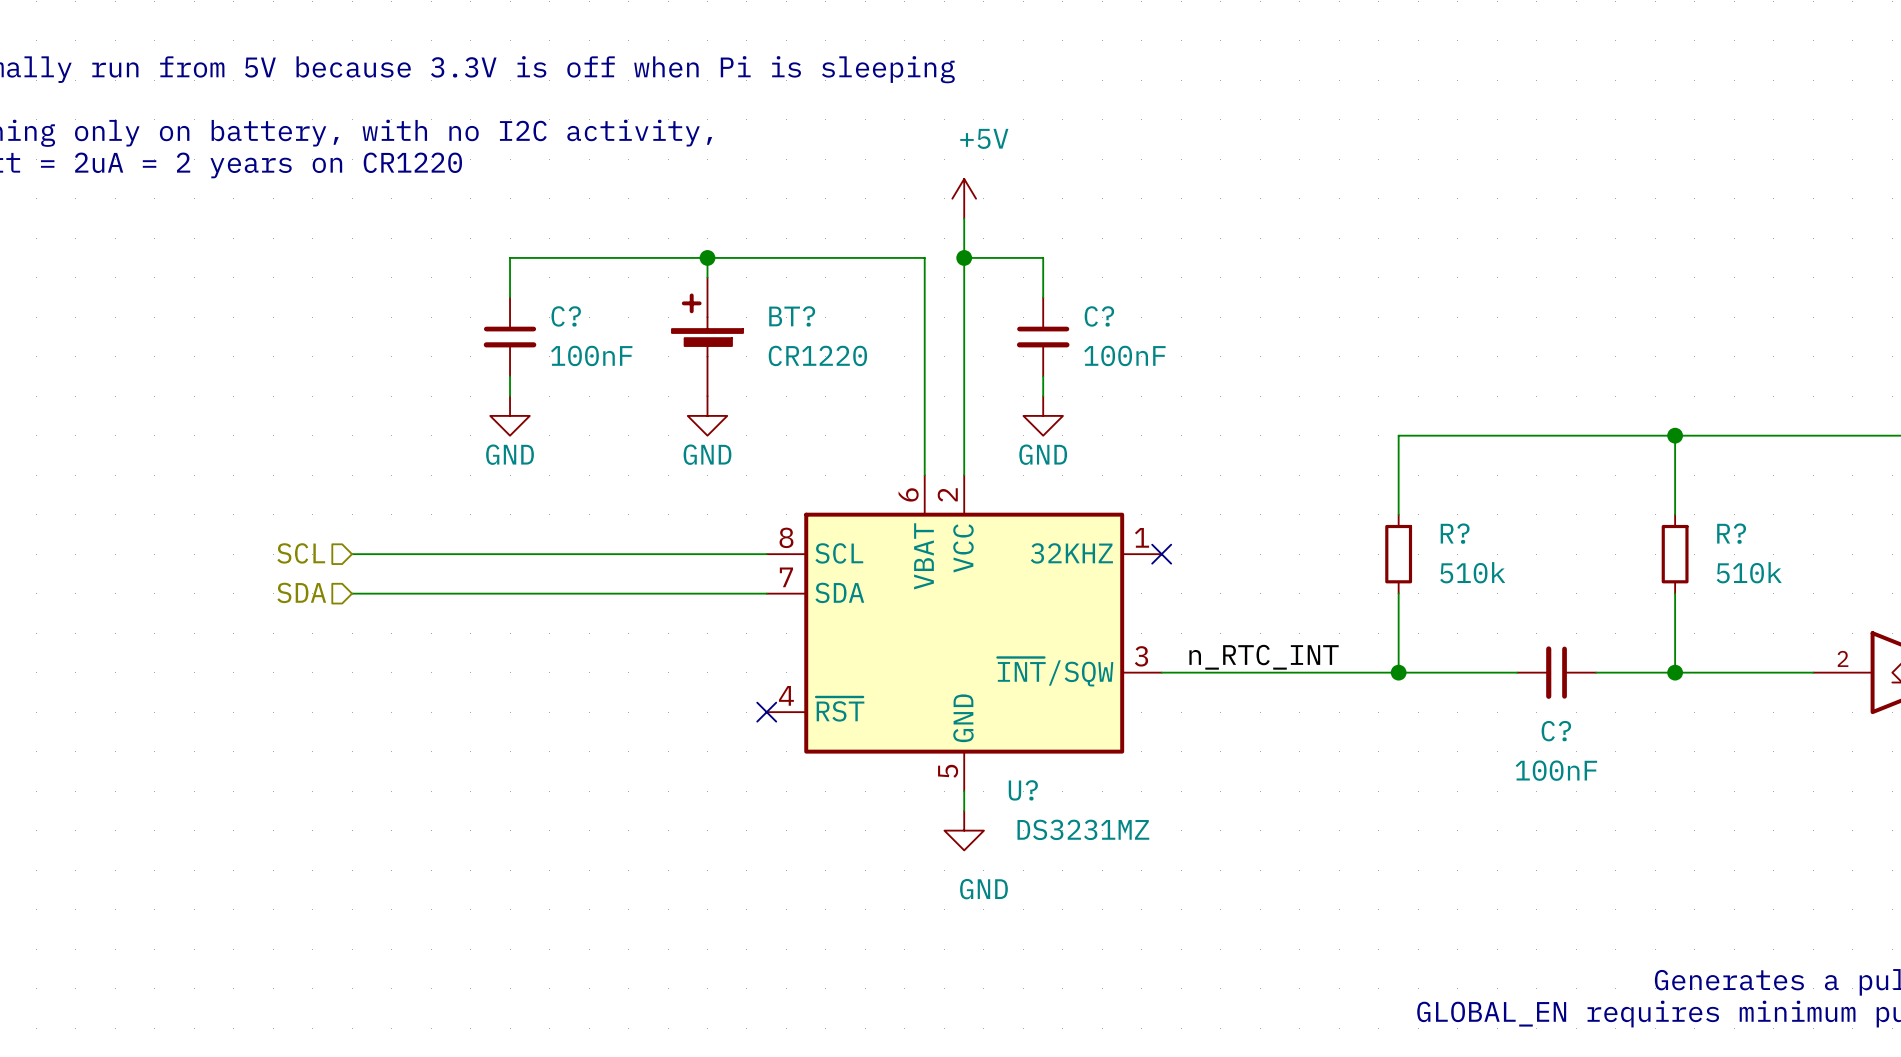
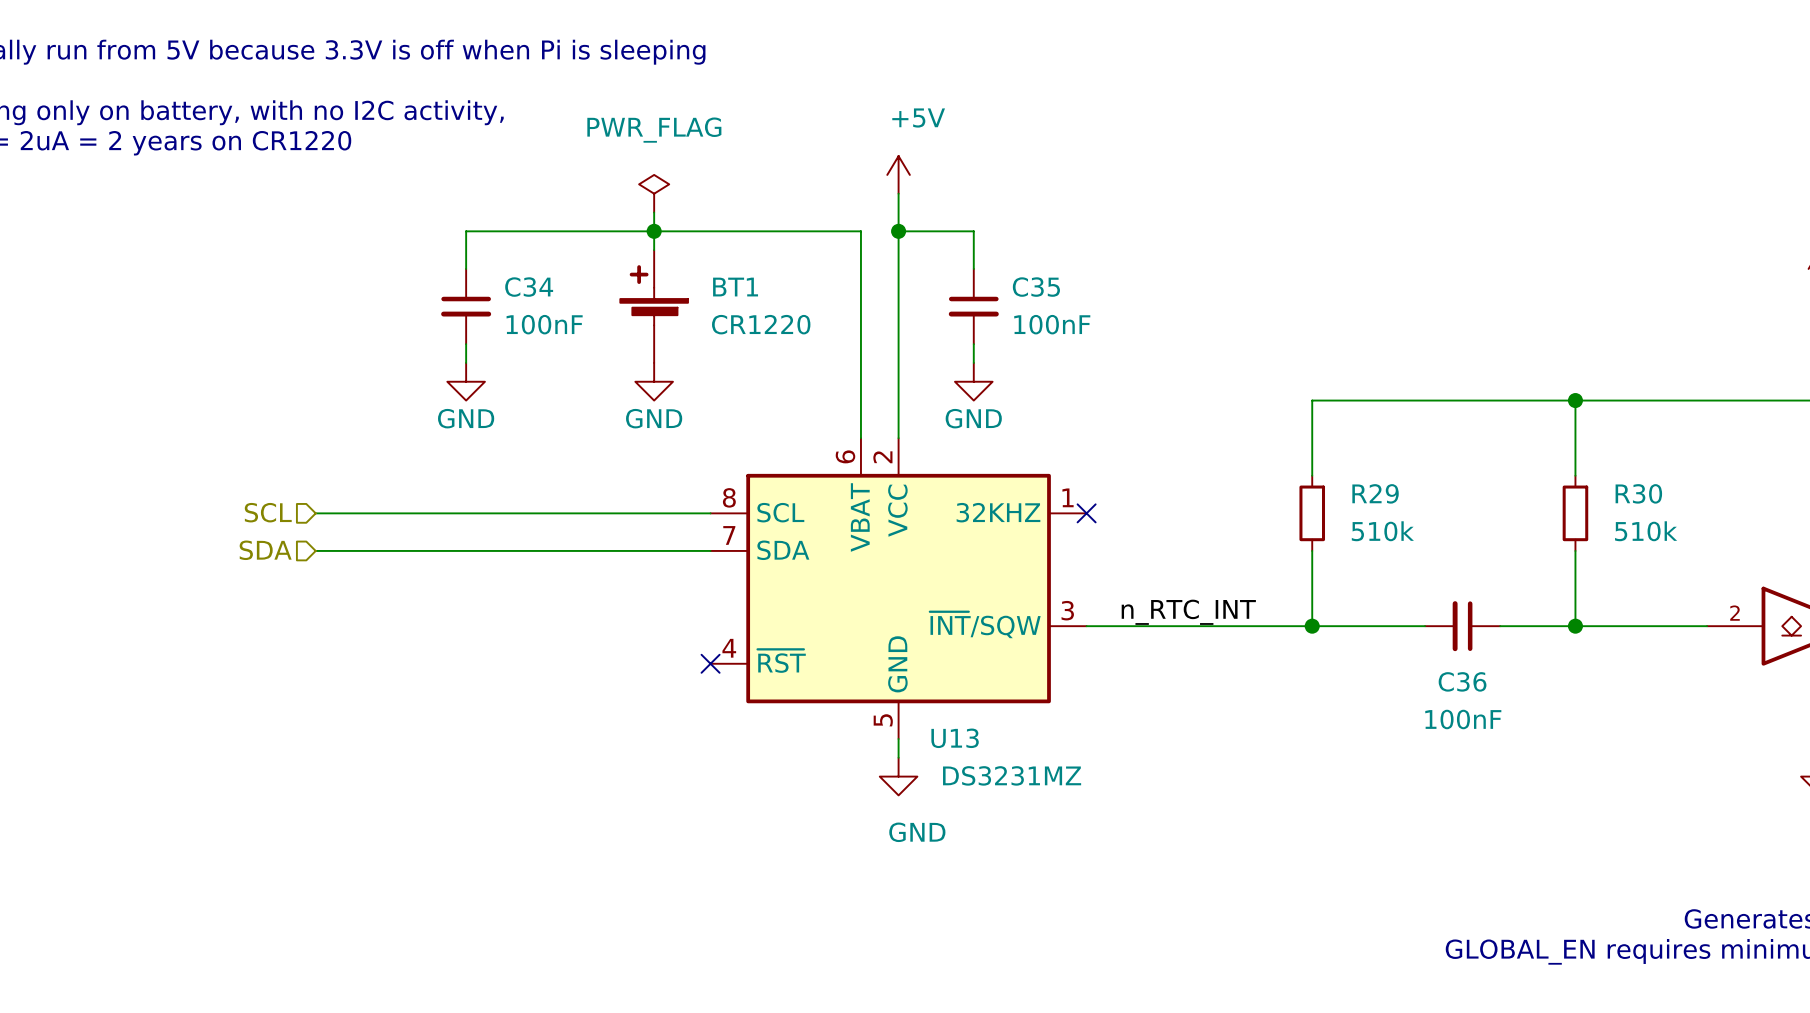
power symbol: none -> PWR_FLAG (654, 193)
wire: none -> (654, 212) (654, 231)
C? name: C? (566, 316) -> C34 (529, 287)
BT? name: BT? (792, 316) -> BT1 (735, 287)
C? name: C? (1099, 316) -> C35 (1036, 287)
R? name: R? (1455, 533) -> R29 (1375, 493)
R? name: R? (1731, 533) -> R30 (1638, 493)
C? name: C? (1556, 731) -> C36 (1462, 681)
U? name: U? (1023, 790) -> U13 (955, 738)

